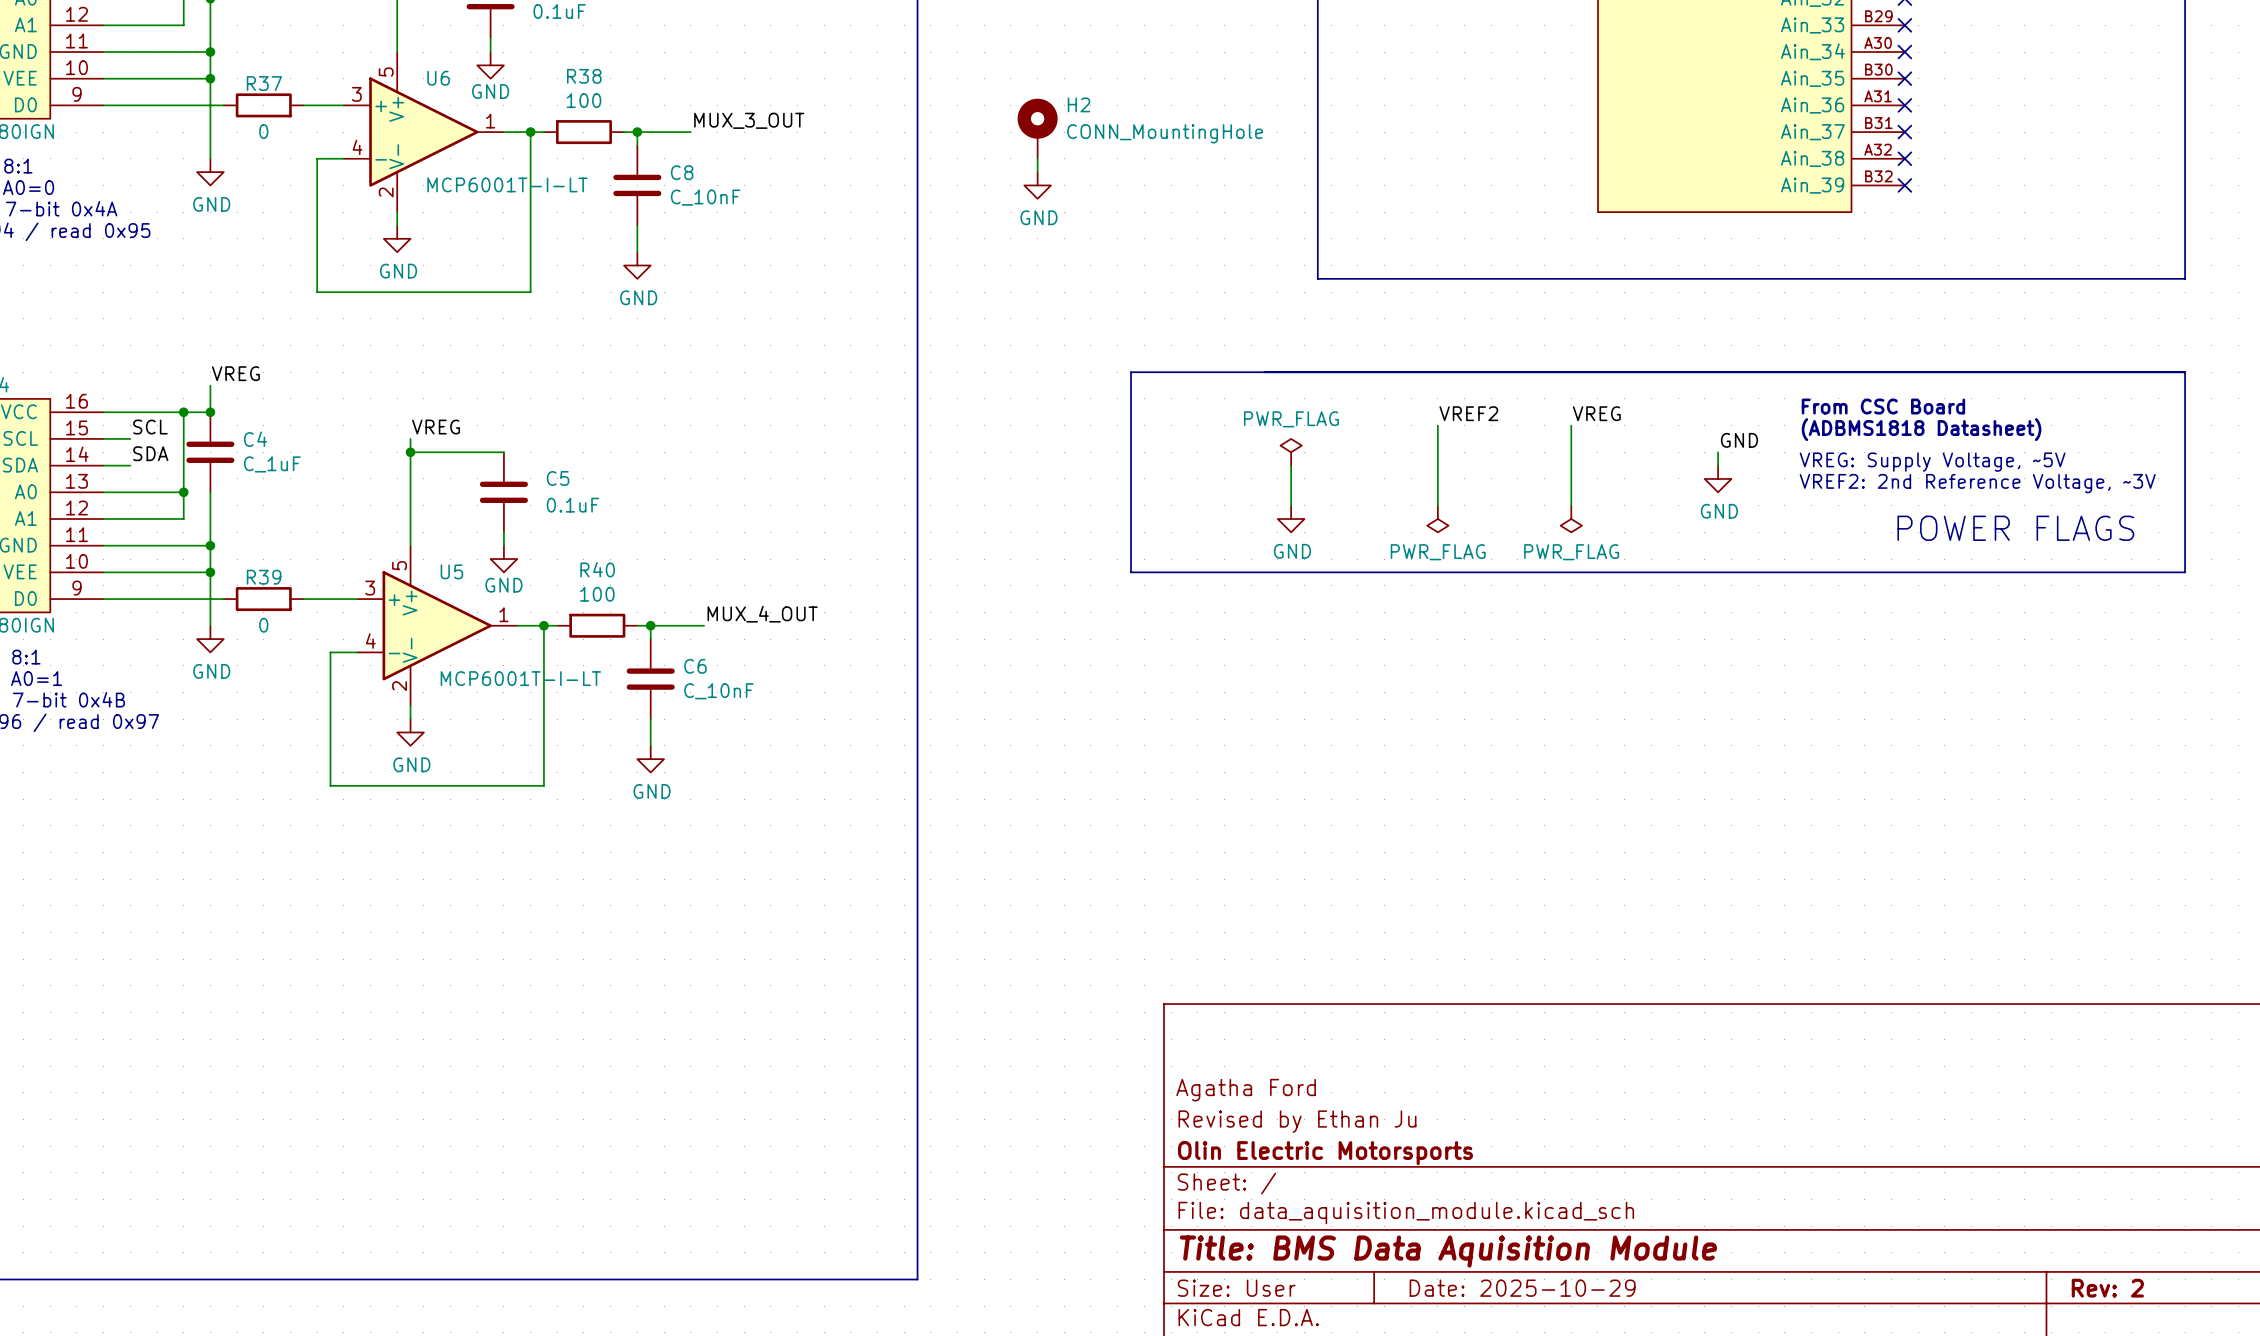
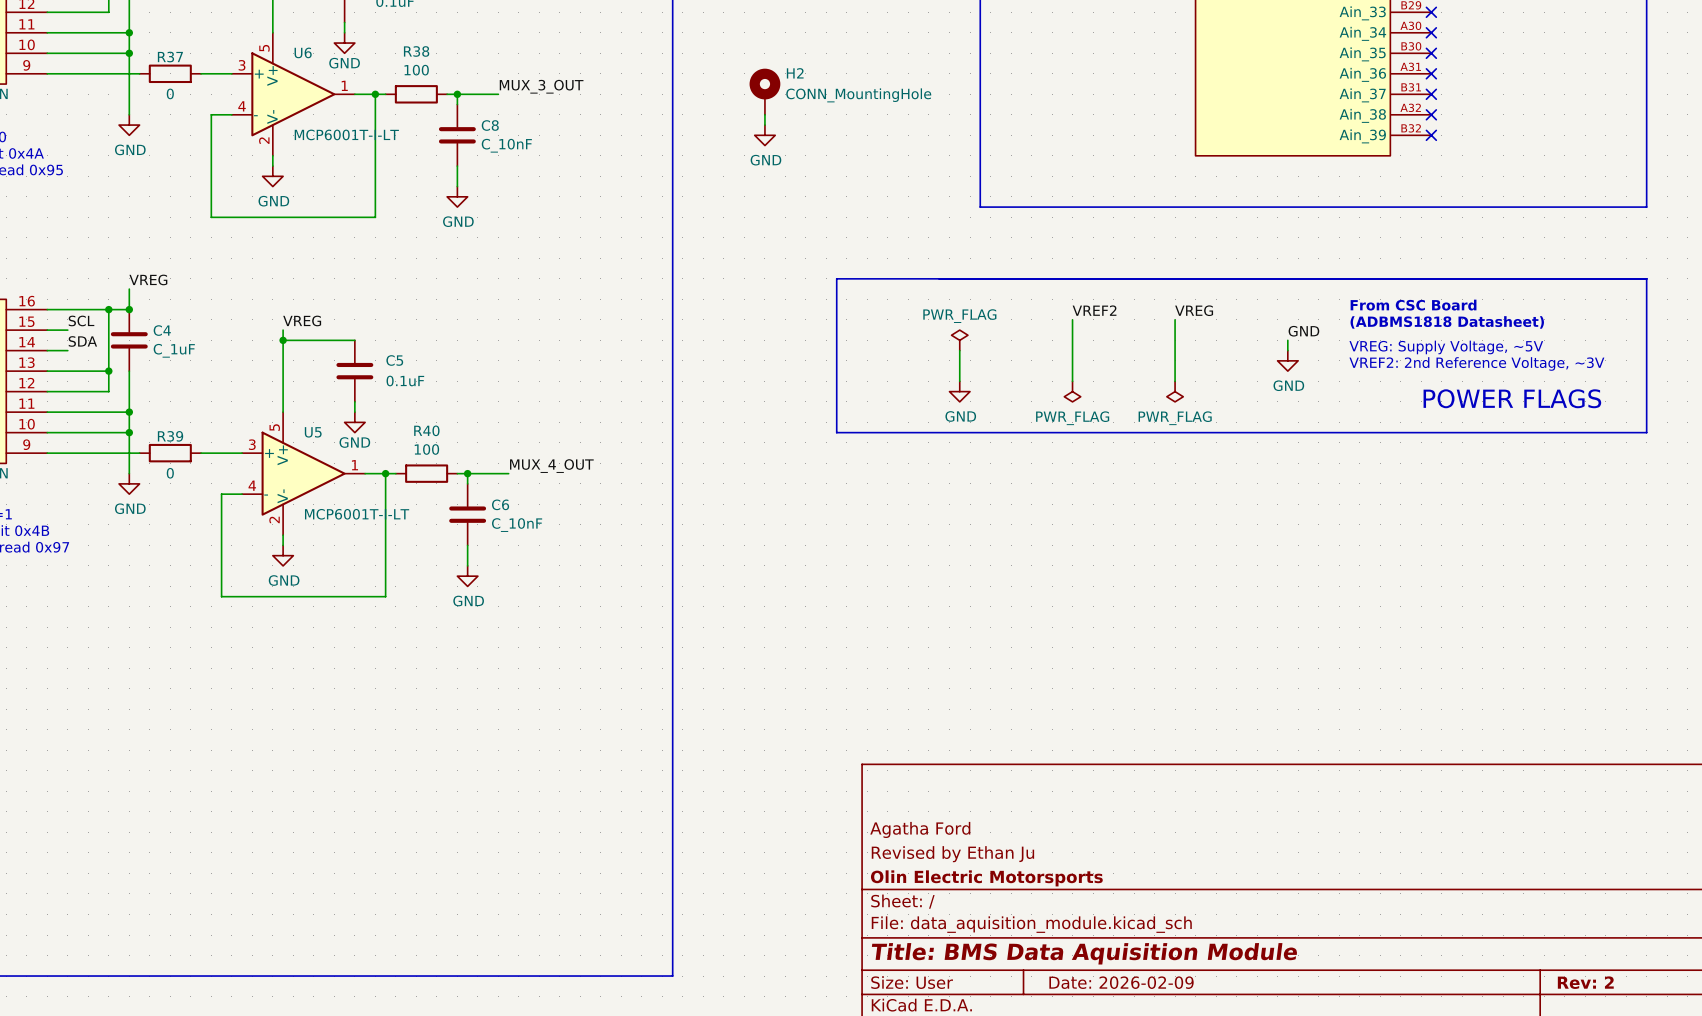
title block: Date: 2025-10-29 (1522, 1288) -> Date: 2026-02-09 (1121, 982)

